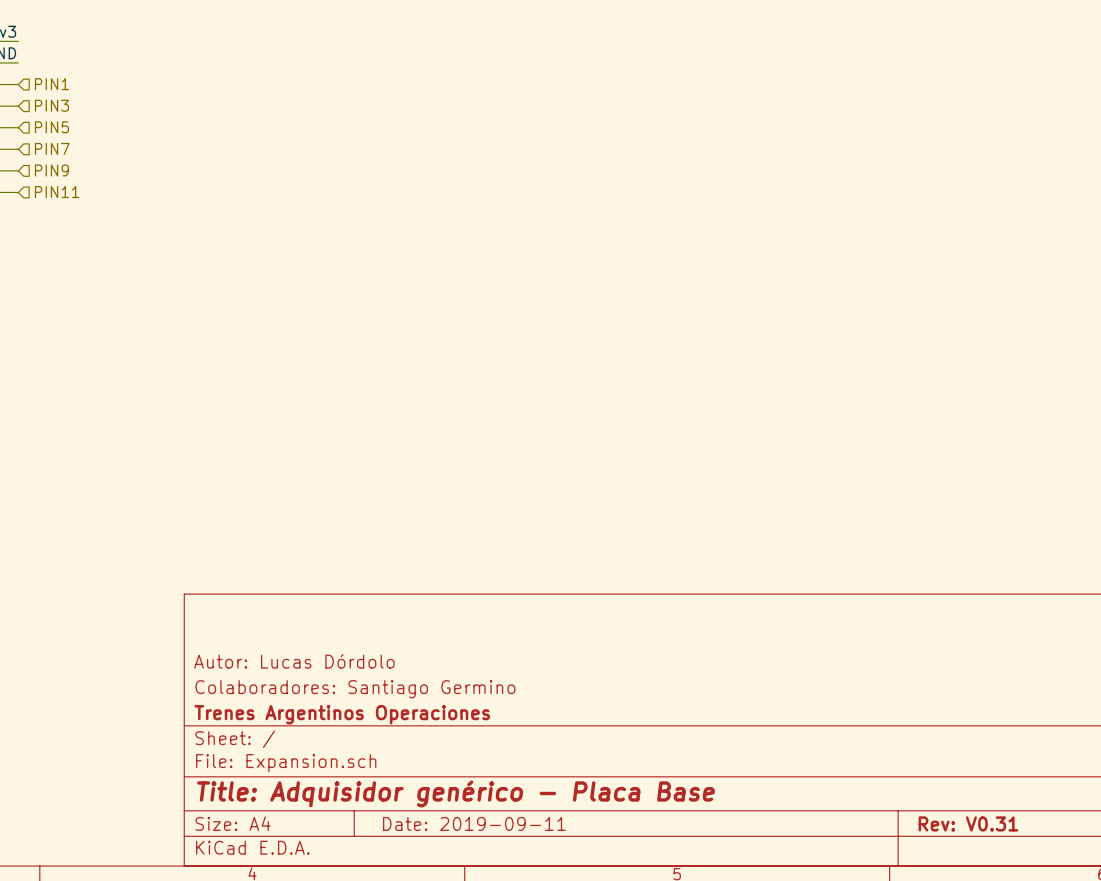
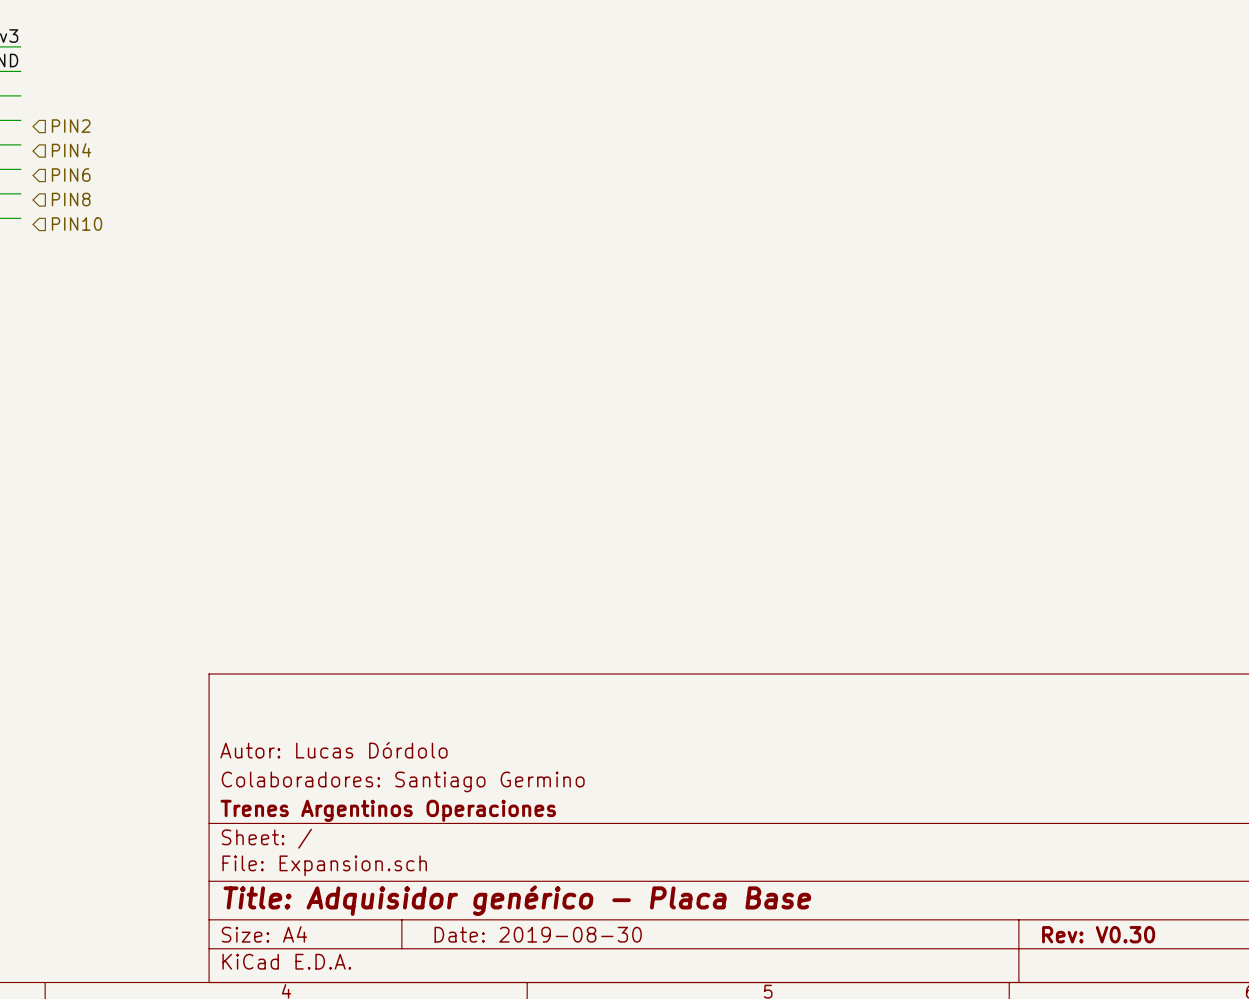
hierarchical label: PIN1 (51, 84) -> none
hierarchical label: PIN3 (51, 105) -> none
hierarchical label: none -> PIN2 (71, 126)
hierarchical label: PIN5 (51, 127) -> none
hierarchical label: none -> PIN4 (71, 150)
hierarchical label: PIN7 (52, 148) -> none
hierarchical label: none -> PIN6 (71, 175)
hierarchical label: PIN9 (51, 170) -> none
hierarchical label: none -> PIN8 (71, 199)
hierarchical label: PIN11 (57, 192) -> none
hierarchical label: none -> PIN10 (77, 224)
title block: Date: 2019-09-11 (474, 823) -> Date: 2019-08-30 (538, 934)
title block: Rev: V0.31 (968, 823) -> Rev: V0.30 (1098, 934)

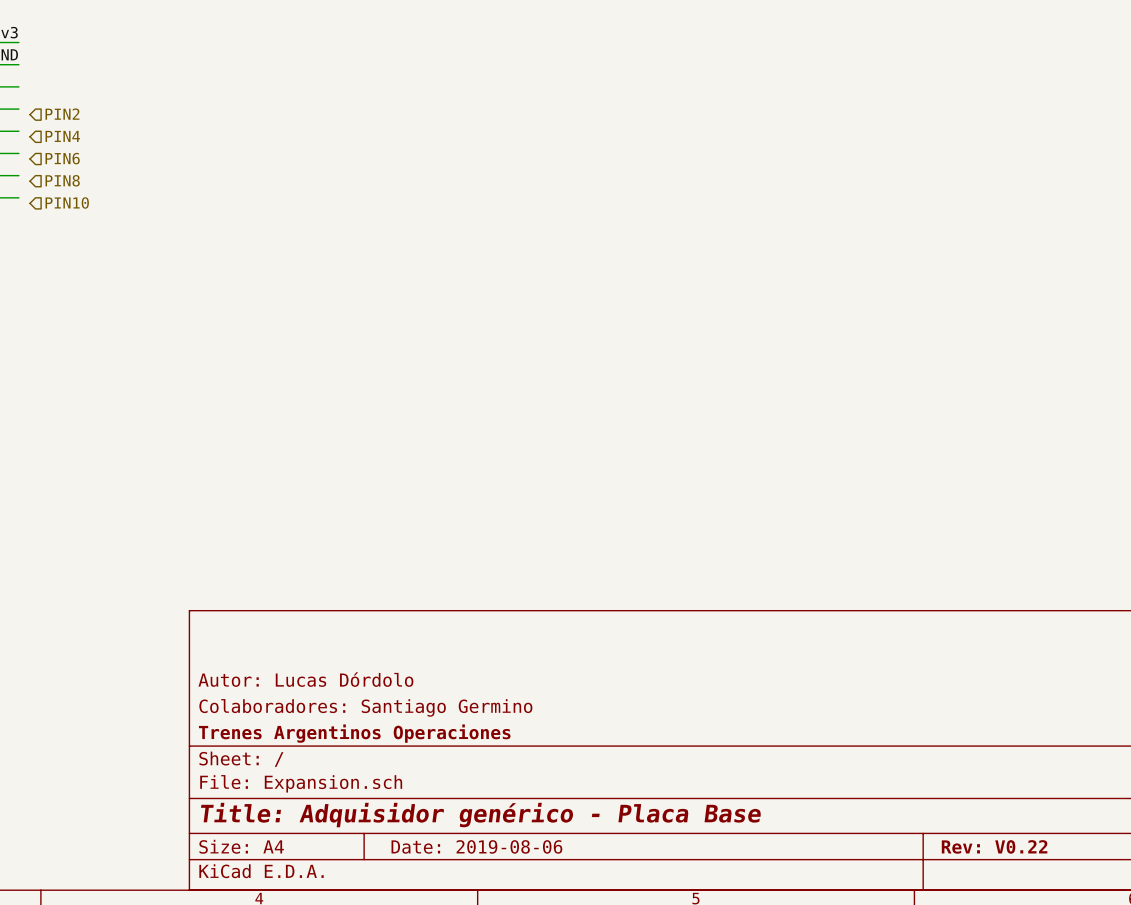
title block: Date: 2019-08-30 (538, 934) -> Date: 2019-08-06 (476, 846)
title block: Rev: V0.30 (1098, 934) -> Rev: V0.22 (994, 846)

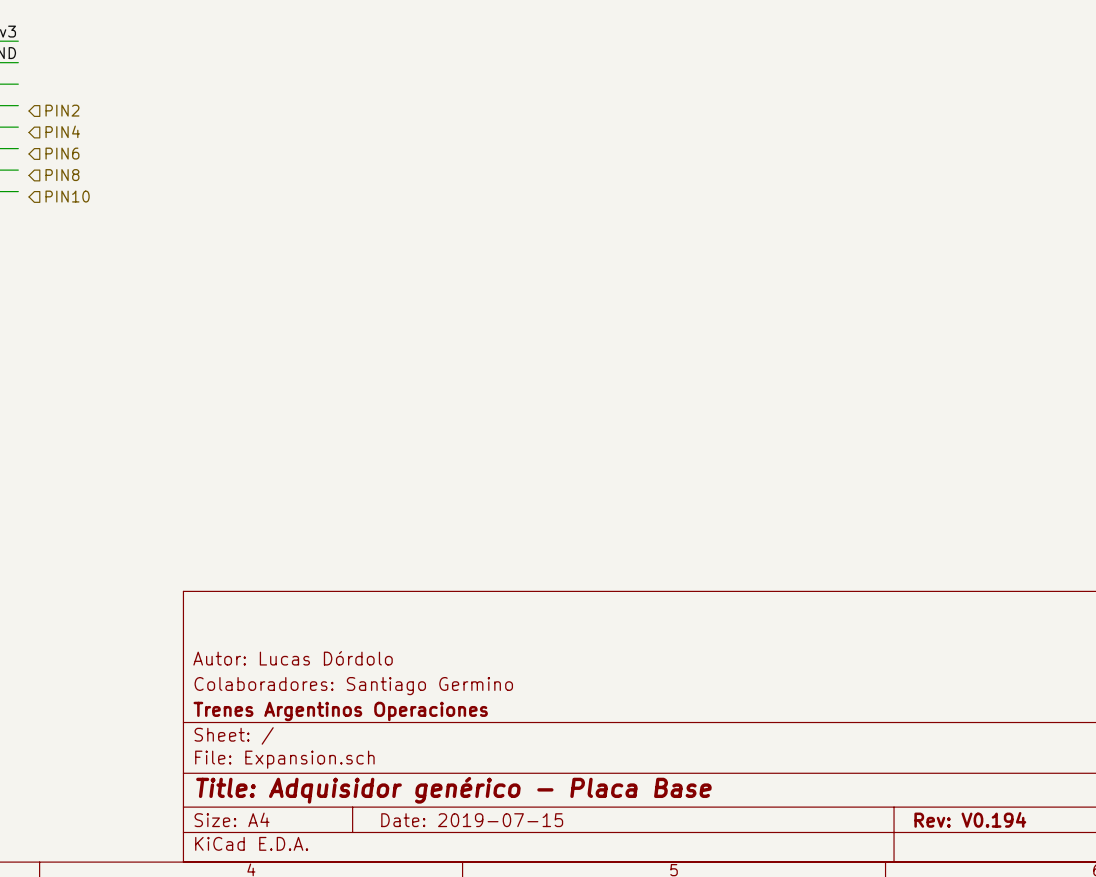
title block: Date: 2019-08-06 (476, 846) -> Date: 2019-07-15 (472, 820)
title block: Rev: V0.22 (994, 846) -> Rev: V0.194 (970, 819)

